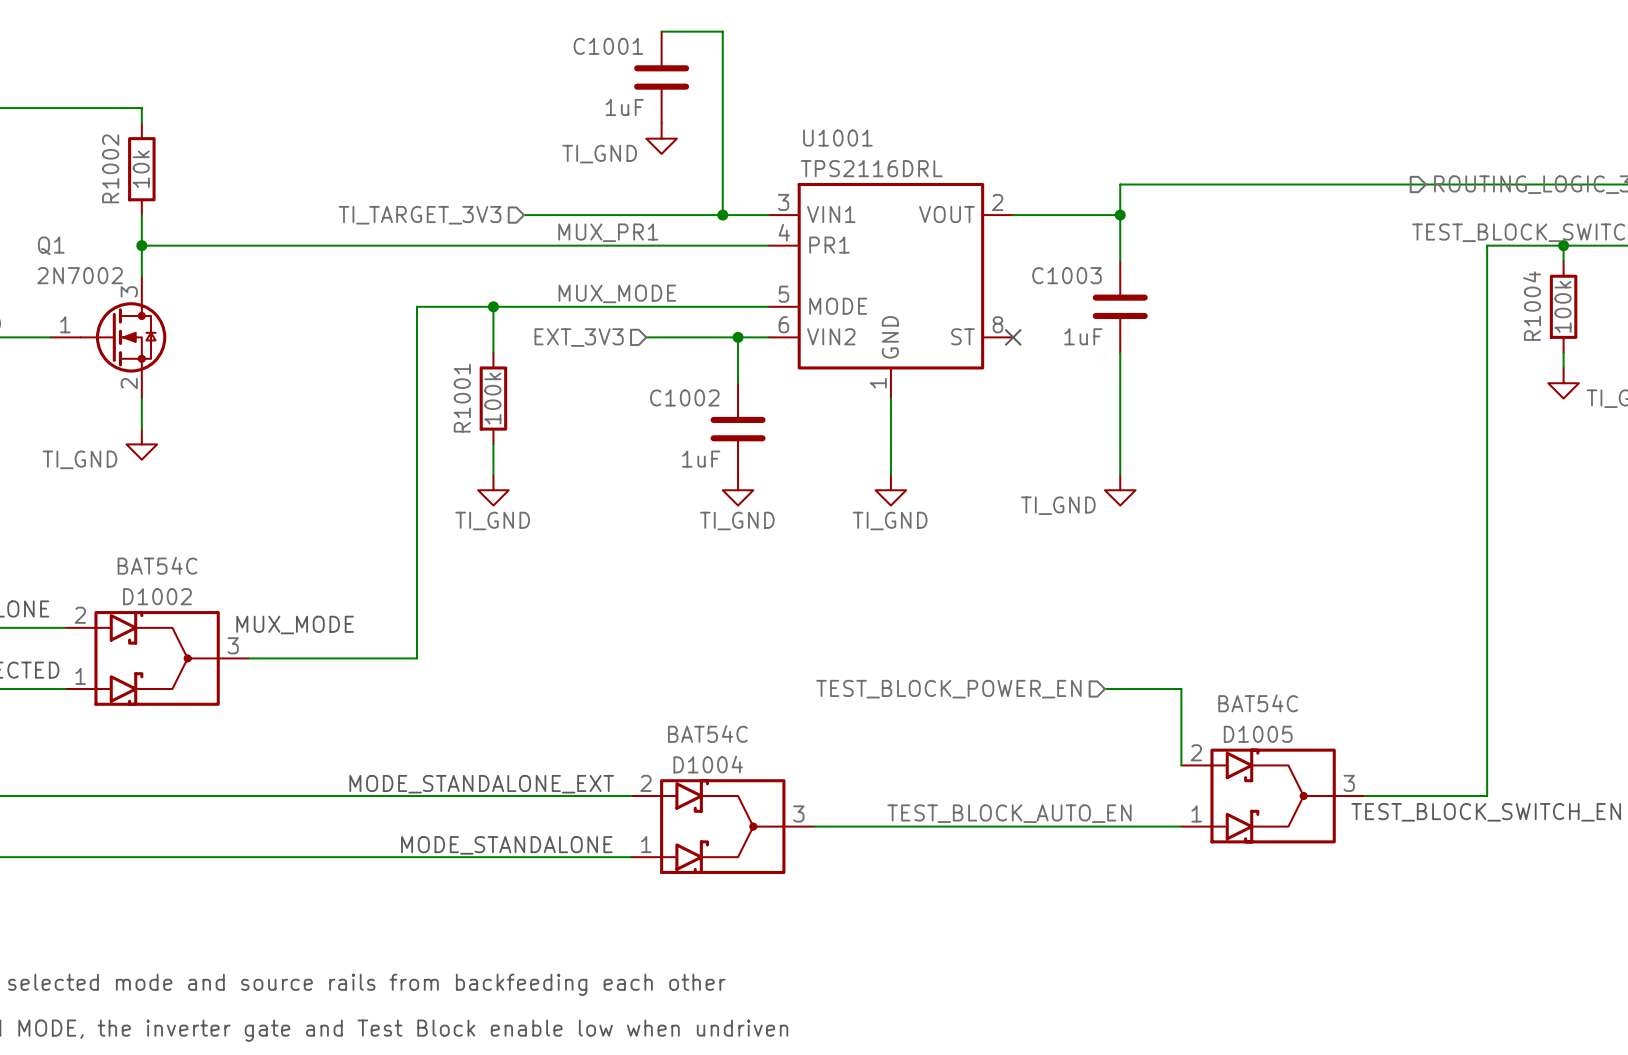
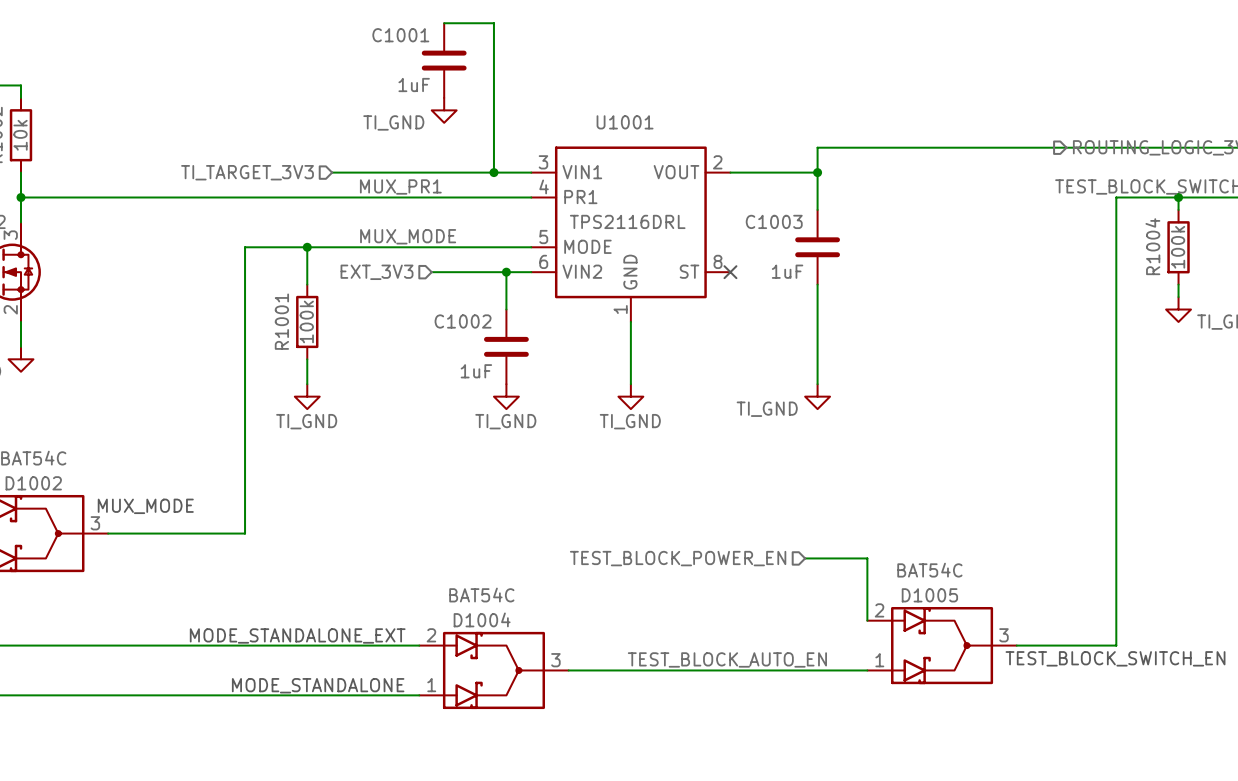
U1001 name position: U1001 (837, 138) -> U1001 (625, 122)
U1001 value position: TPS2116DRL (871, 168) -> TPS2116DRL (627, 221)

